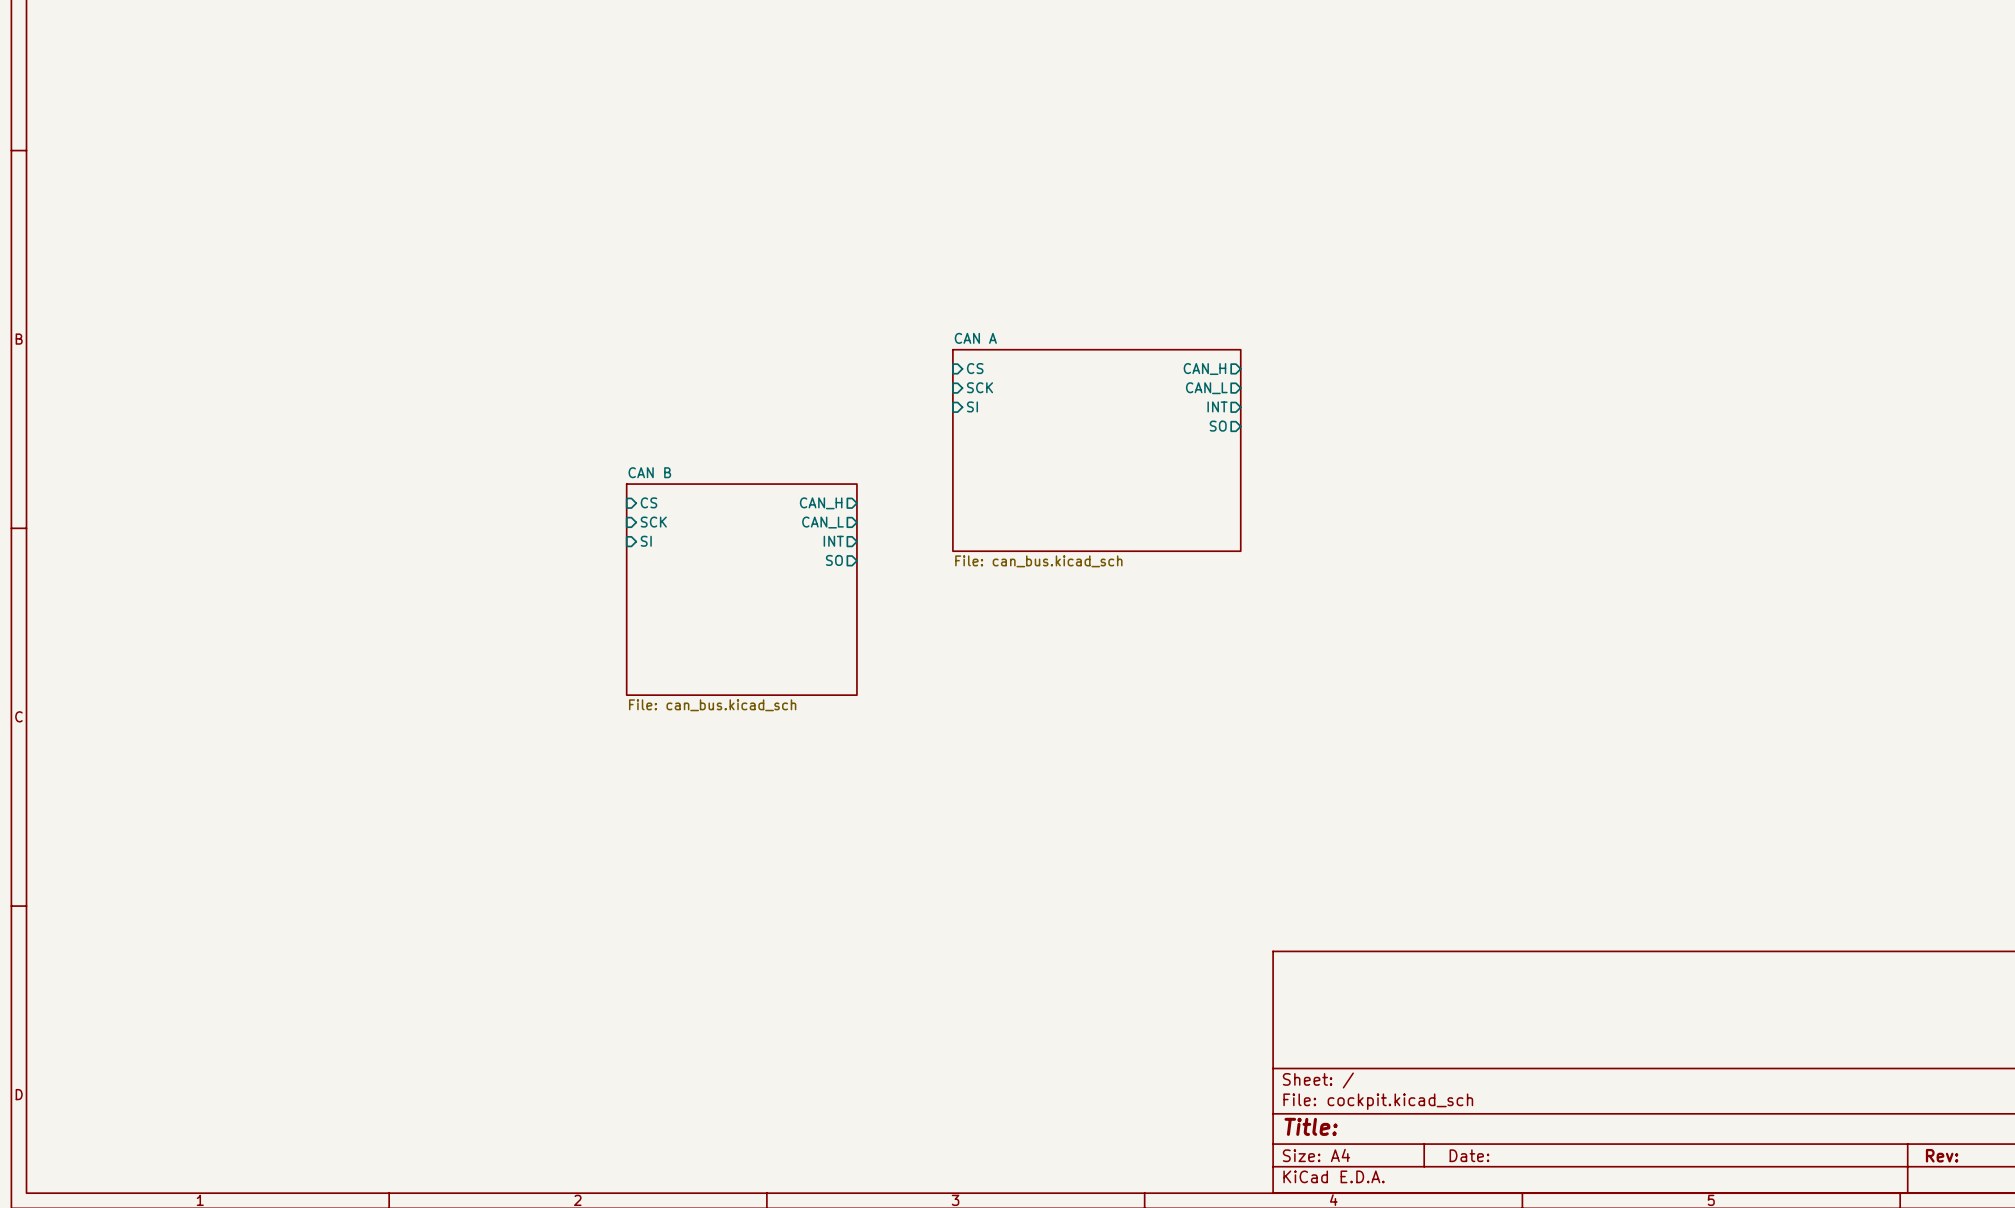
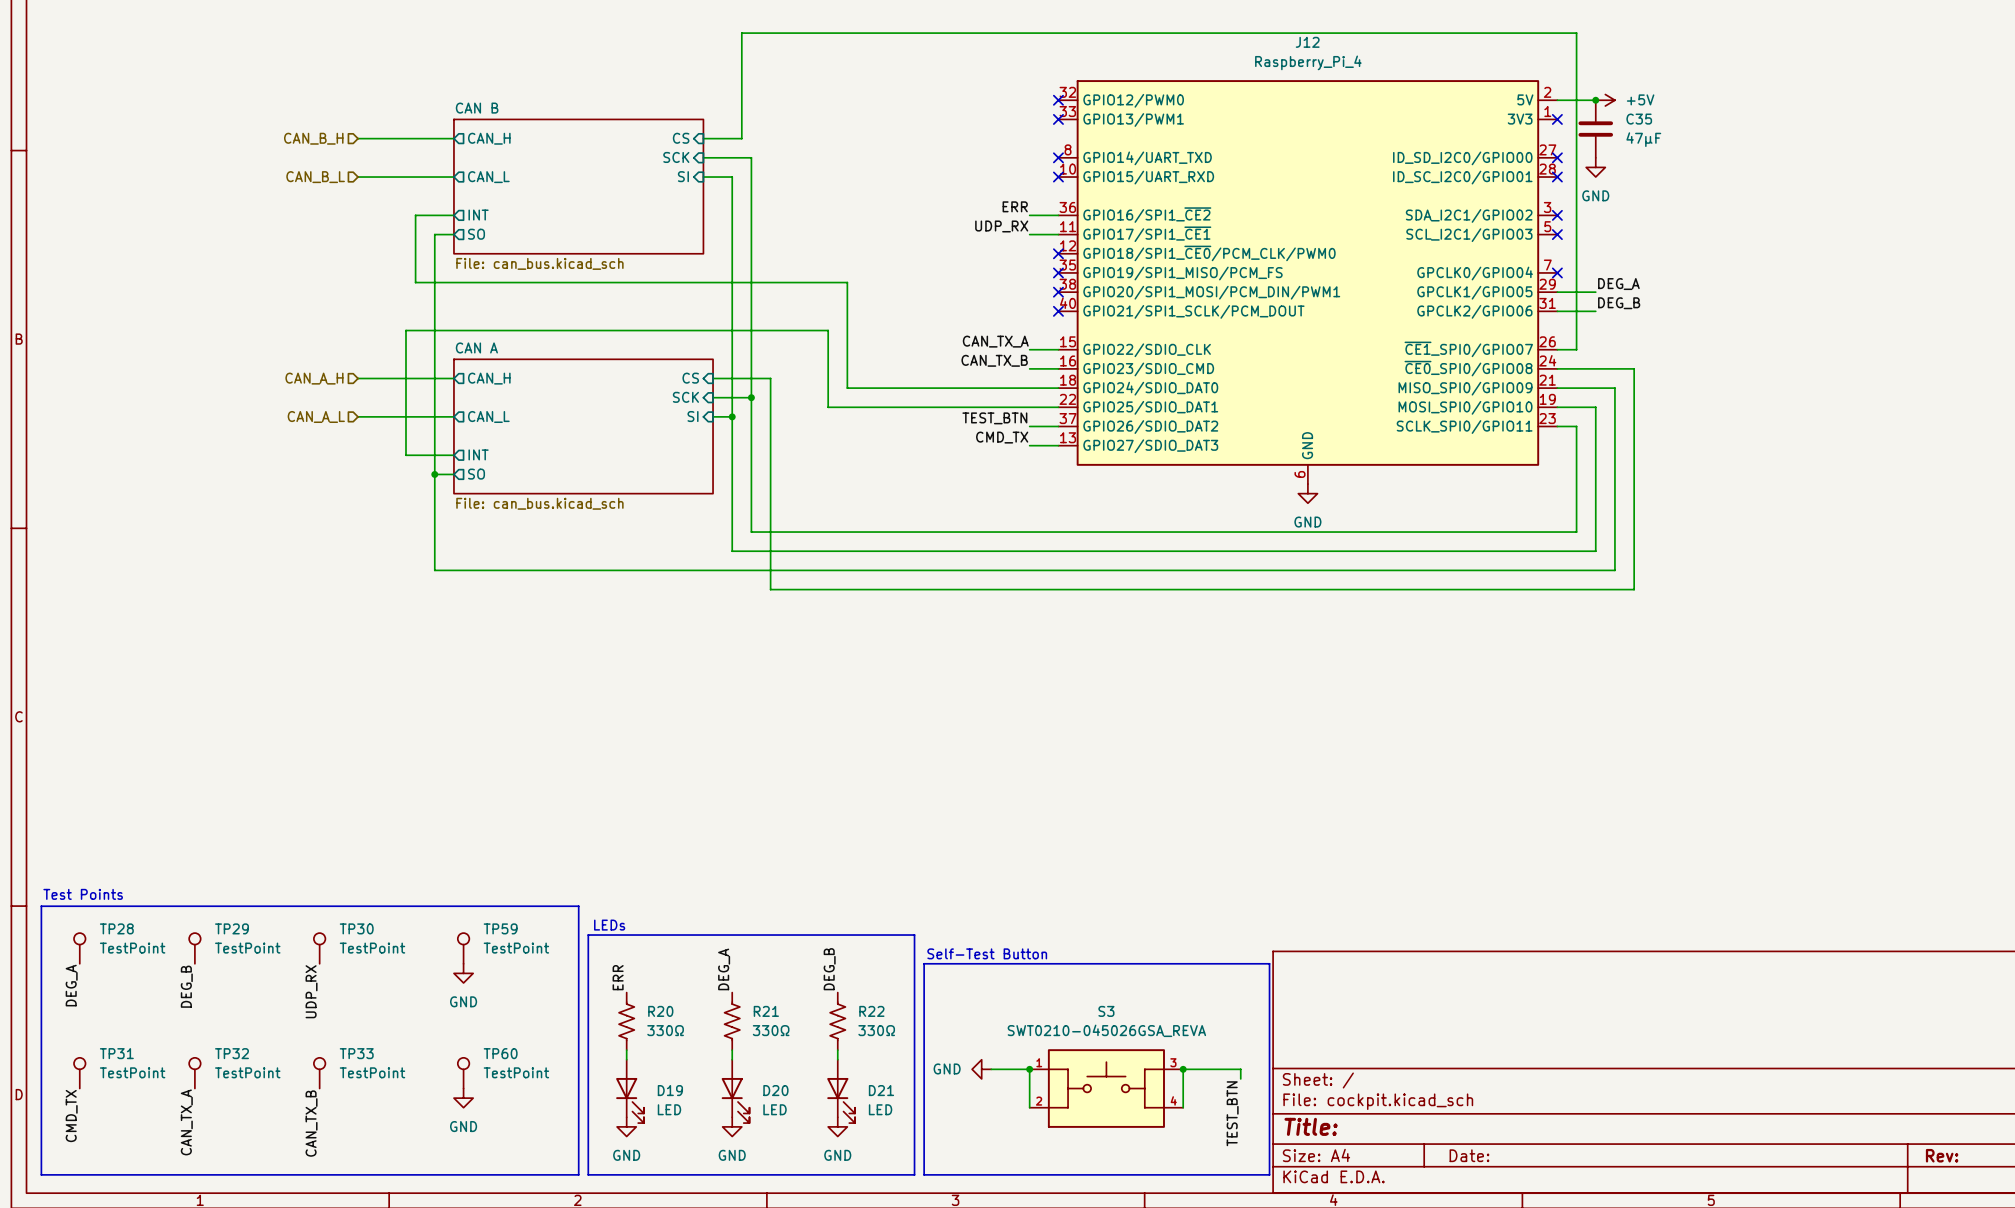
no-connect mark: none -> (1058, 100)
wire: none -> (1557, 100) (1595, 100)
junction: none -> (1595, 100)
power symbol: none -> +5V (1605, 100)
no-connect mark: none -> (1058, 119)
no-connect mark: none -> (1557, 119)
C35: none -> 47μF (1595, 129)
hierarchical label: none -> CAN_B_H (313, 138)
wire: none -> (358, 138) (453, 138)
sheet pin: none -> CAN_H (489, 138)
sheet pin: none -> CS (681, 138)
wire: none -> (703, 138) (741, 138) (741, 33) (1576, 33) (1576, 349) (1557, 349)
sheet pin: none -> SCK (676, 157)
wire: none -> (703, 157) (751, 157) (751, 532) (1576, 532) (1576, 426) (1557, 426)
no-connect mark: none -> (1058, 157)
no-connect mark: none -> (1557, 157)
power symbol: none -> GND (1595, 167)
sheet pin: none -> SI (683, 176)
hierarchical label: none -> CAN_B_L (315, 177)
wire: none -> (358, 177) (453, 177)
sheet pin: none -> CAN_L (488, 177)
wire: none -> (703, 177) (732, 177) (732, 551) (1595, 551) (1595, 407) (1557, 407)
no-connect mark: none -> (1058, 177)
no-connect mark: none -> (1557, 177)
sheet CAN B: none -> File: can_bus.kicad_sch (578, 186)
label: none -> ERR (1015, 206)
wire: none -> (453, 215) (415, 215) (415, 282) (847, 282) (847, 388) (1058, 388)
sheet pin: none -> INT (478, 215)
wire: none -> (1029, 215) (1058, 215)
no-connect mark: none -> (1557, 215)
label: none -> UDP_RX (1001, 226)
wire: none -> (453, 234) (434, 234) (434, 570) (1614, 570) (1614, 388) (1557, 388)
sheet pin: none -> SO (476, 234)
wire: none -> (1029, 234) (1058, 234)
no-connect mark: none -> (1557, 234)
no-connect mark: none -> (1058, 253)
no-connect mark: none -> (1058, 272)
no-connect mark: none -> (1557, 272)
J12: none -> Raspberry_Pi_4 (1307, 282)
label: none -> DEG_A (1618, 284)
no-connect mark: none -> (1058, 292)
wire: none -> (1557, 292) (1595, 292)
label: none -> DEG_B (1619, 303)
no-connect mark: none -> (1058, 311)
wire: none -> (1557, 311) (1595, 311)
label: none -> CAN_TX_A (995, 341)
label: none -> CAN_TX_B (994, 360)
sheet pin: CS (975, 368) -> none
wire: none -> (1029, 368) (1058, 368)
wire: none -> (1557, 368) (1634, 368) (1634, 589) (770, 589) (770, 378) (713, 378)
sheet pin: CAN_H (1204, 369) -> none
hierarchical label: none -> CAN_A_H (314, 378)
wire: none -> (358, 378) (453, 378)
sheet pin: none -> CAN_H (489, 378)
sheet pin: none -> CS (690, 378)
sheet pin: SCK (980, 387) -> none
sheet pin: CAN_L (1206, 388) -> none
sheet pin: none -> SCK (685, 397)
wire: none -> (713, 397) (751, 397)
junction: none -> (751, 397)
sheet pin: SI (972, 406) -> none
sheet pin: INT (1217, 406) -> none
wire: none -> (1058, 407) (828, 407) (828, 330) (405, 330) (405, 455) (453, 455)
hierarchical label: none -> CAN_A_L (316, 416)
wire: none -> (358, 416) (453, 416)
sheet pin: none -> CAN_L (488, 416)
sheet pin: none -> SI (693, 416)
wire: none -> (713, 416) (732, 416)
junction: none -> (732, 416)
label: none -> TEST_BTN (994, 418)
sheet CAN A: none -> File: can_bus.kicad_sch (583, 426)
wire: none -> (1029, 426) (1058, 426)
sheet pin: SO (1218, 426) -> none
label: none -> CMD_TX (1002, 437)
wire: none -> (1029, 445) (1058, 445)
sheet CAN A: File: can_bus.kicad_sch (1096, 450) -> none
sheet pin: none -> INT (478, 454)
wire: none -> (434, 474) (453, 474)
junction: none -> (434, 474)
sheet pin: none -> SO (476, 474)
power symbol: none -> GND (1307, 493)
sheet pin: CS (648, 502) -> none
sheet pin: CAN_H (821, 503) -> none
sheet pin: SCK (653, 522) -> none
sheet pin: CAN_L (822, 522) -> none
sheet pin: SI (646, 541) -> none
sheet pin: INT (833, 541) -> none
sheet pin: SO (834, 560) -> none
sheet CAN B: File: can_bus.kicad_sch (741, 589) -> none
text: none -> Test Points (83, 894)
line: none -> (41, 906) (578, 906) (578, 1174) (41, 1174) (41, 906)
text: none -> LEDs (609, 925)
line: none -> (588, 935) (914, 935) (914, 1174) (588, 1174) (588, 935)
TP28: none -> TestPoint (79, 948)
TP29: none -> TestPoint (194, 948)
TP30: none -> TestPoint (319, 948)
TP59: none -> TestPoint (463, 948)
text: none -> Self-Test Button (987, 953)
line: none -> (924, 963) (1269, 963) (1269, 1174) (924, 1174) (924, 963)
label: none -> DEG_A (724, 969)
label: none -> DEG_B (829, 969)
power symbol: none -> GND (463, 973)
label: none -> ERR (618, 977)
label: none -> DEG_A (71, 985)
label: none -> DEG_B (186, 986)
label: none -> UDP_RX (311, 991)
R20: none -> 330Ω (626, 1021)
R21: none -> 330Ω (732, 1021)
R22: none -> 330Ω (837, 1021)
wire: none -> (626, 1050) (626, 1059)
wire: none -> (732, 1050) (732, 1059)
wire: none -> (837, 1050) (837, 1059)
power symbol: none -> GND (981, 1069)
wire: none -> (991, 1069) (1029, 1069) (1029, 1107)
junction: none -> (1029, 1069)
junction: none -> (1183, 1069)
TP31: none -> TestPoint (79, 1073)
TP32: none -> TestPoint (194, 1073)
TP33: none -> TestPoint (319, 1073)
TP60: none -> TestPoint (463, 1073)
wire: none -> (1240, 1078) (1240, 1069) (1183, 1069) (1183, 1107)
S3: none -> SWT0210-045026GSA_REVA (1106, 1088)
D19: none -> LED (630, 1091)
D20: none -> LED (735, 1091)
D21: none -> LED (841, 1091)
power symbol: none -> GND (463, 1098)
label: none -> TEST_BTN (1232, 1113)
label: none -> CMD_TX (71, 1116)
label: none -> CAN_TX_A (186, 1122)
label: none -> CAN_TX_B (311, 1123)
power symbol: none -> GND (626, 1126)
power symbol: none -> GND (732, 1126)
power symbol: none -> GND (837, 1126)

